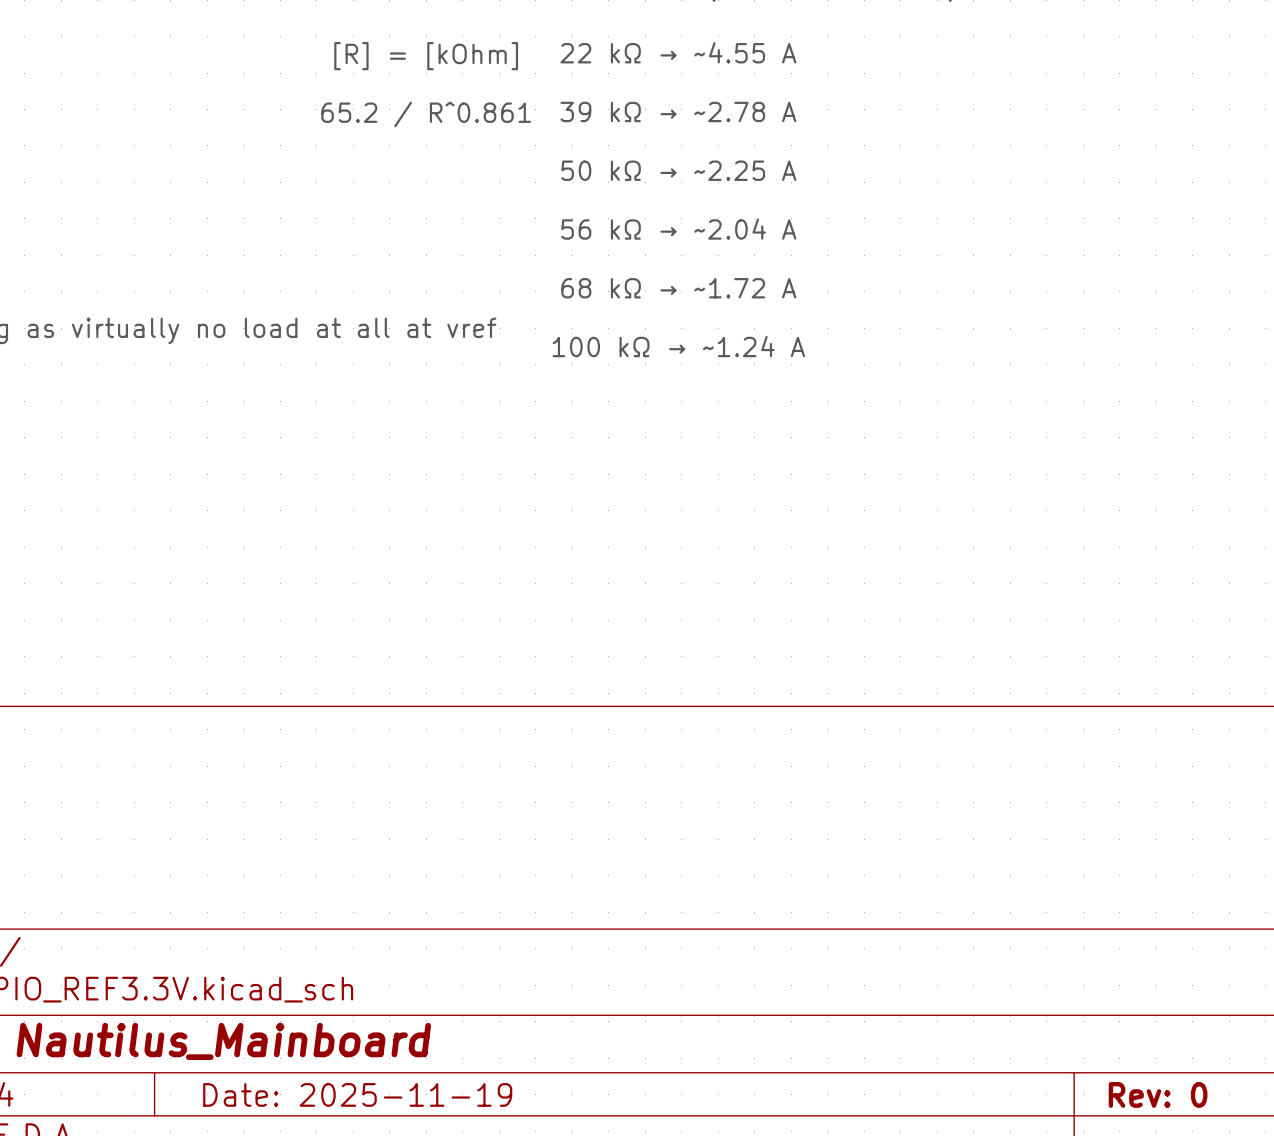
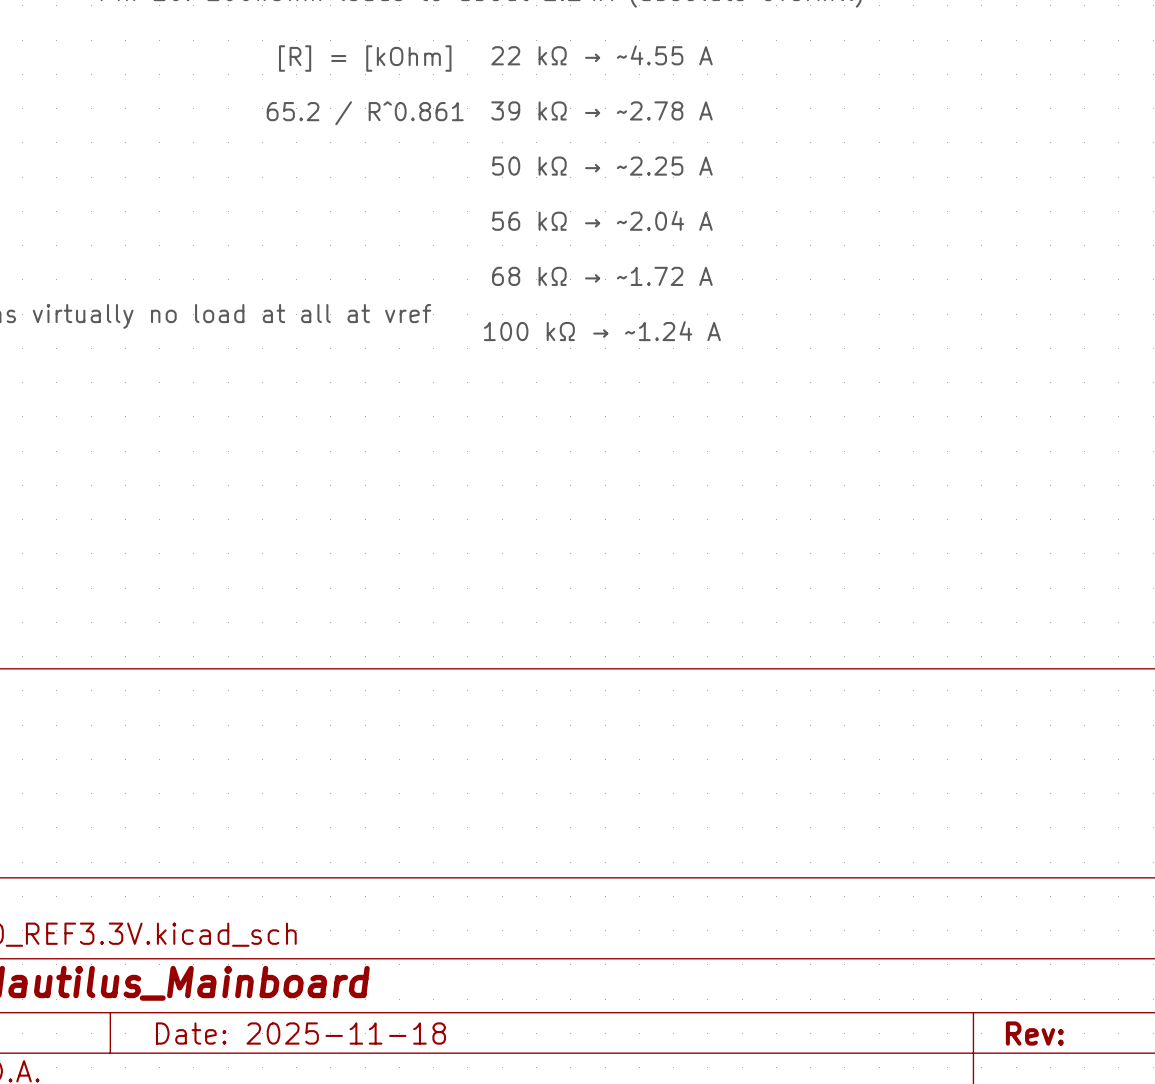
title block: Date: 2025-11-19 (357, 1094) -> Date: 2025-11-18 (300, 1033)
title block: Rev: 0 (1158, 1094) -> Rev: (1034, 1033)

